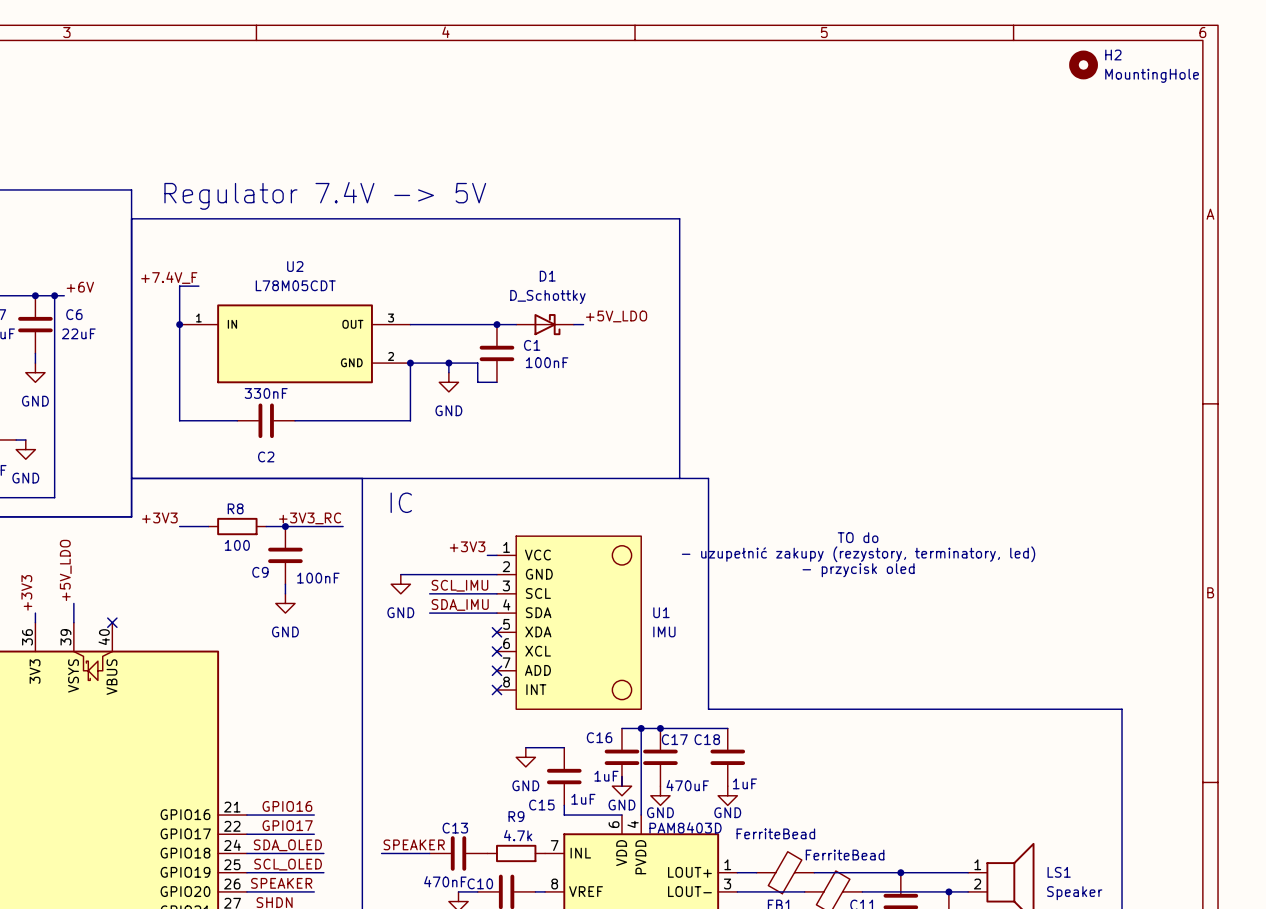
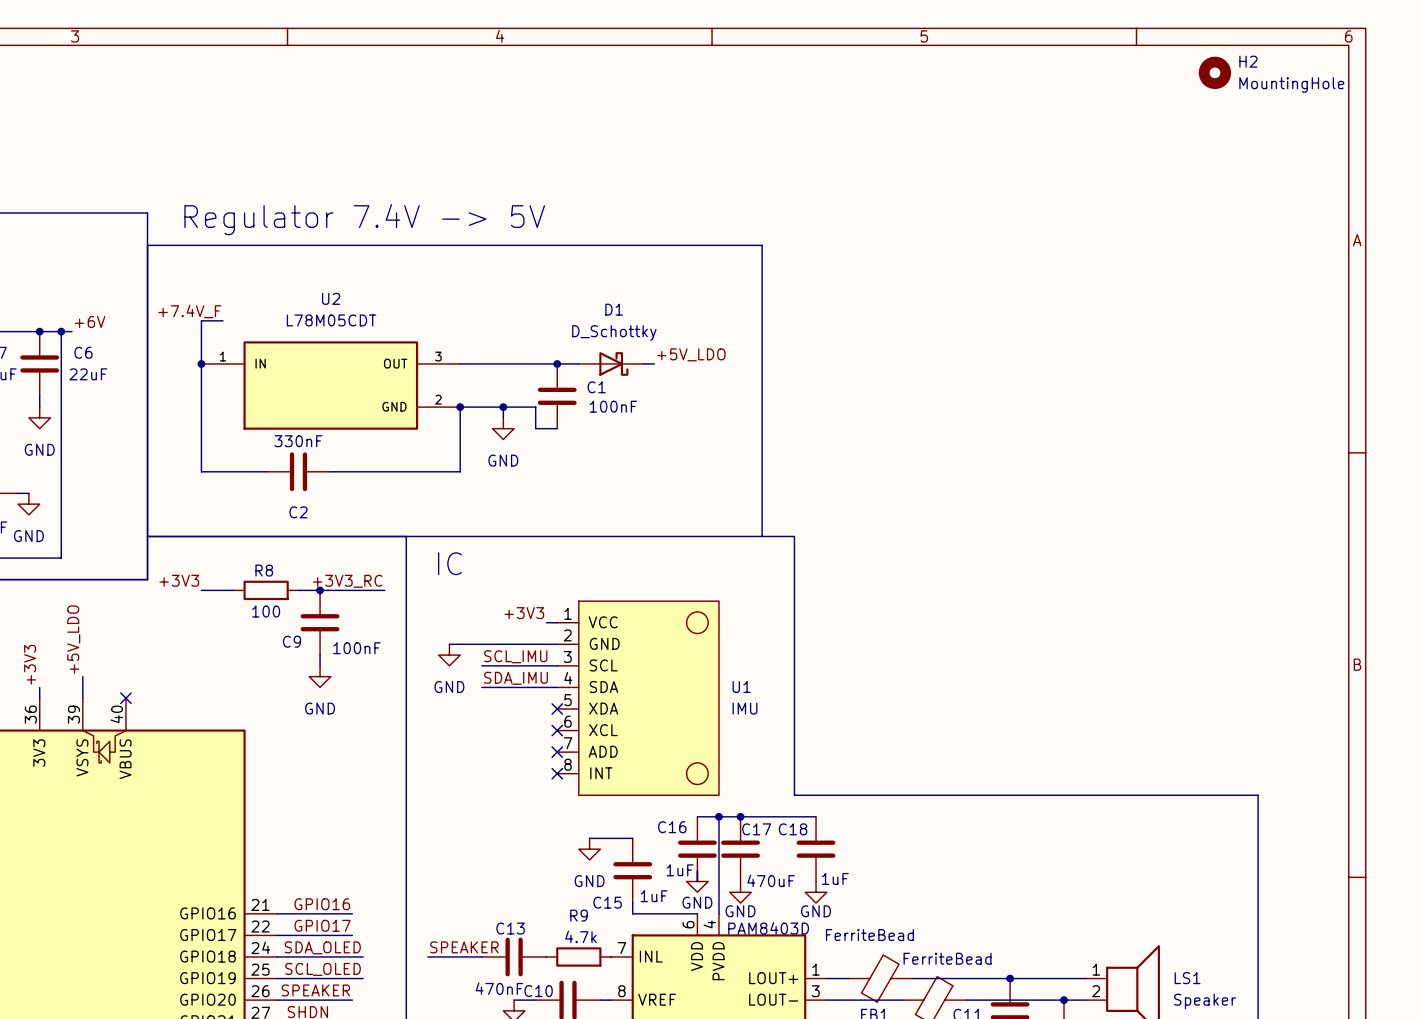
text: TO do (858, 537) -> none
text: - uzupełnić zakupy (rezystory, terminatory, led) (858, 554) -> none
text: - przycisk oled (858, 570) -> none

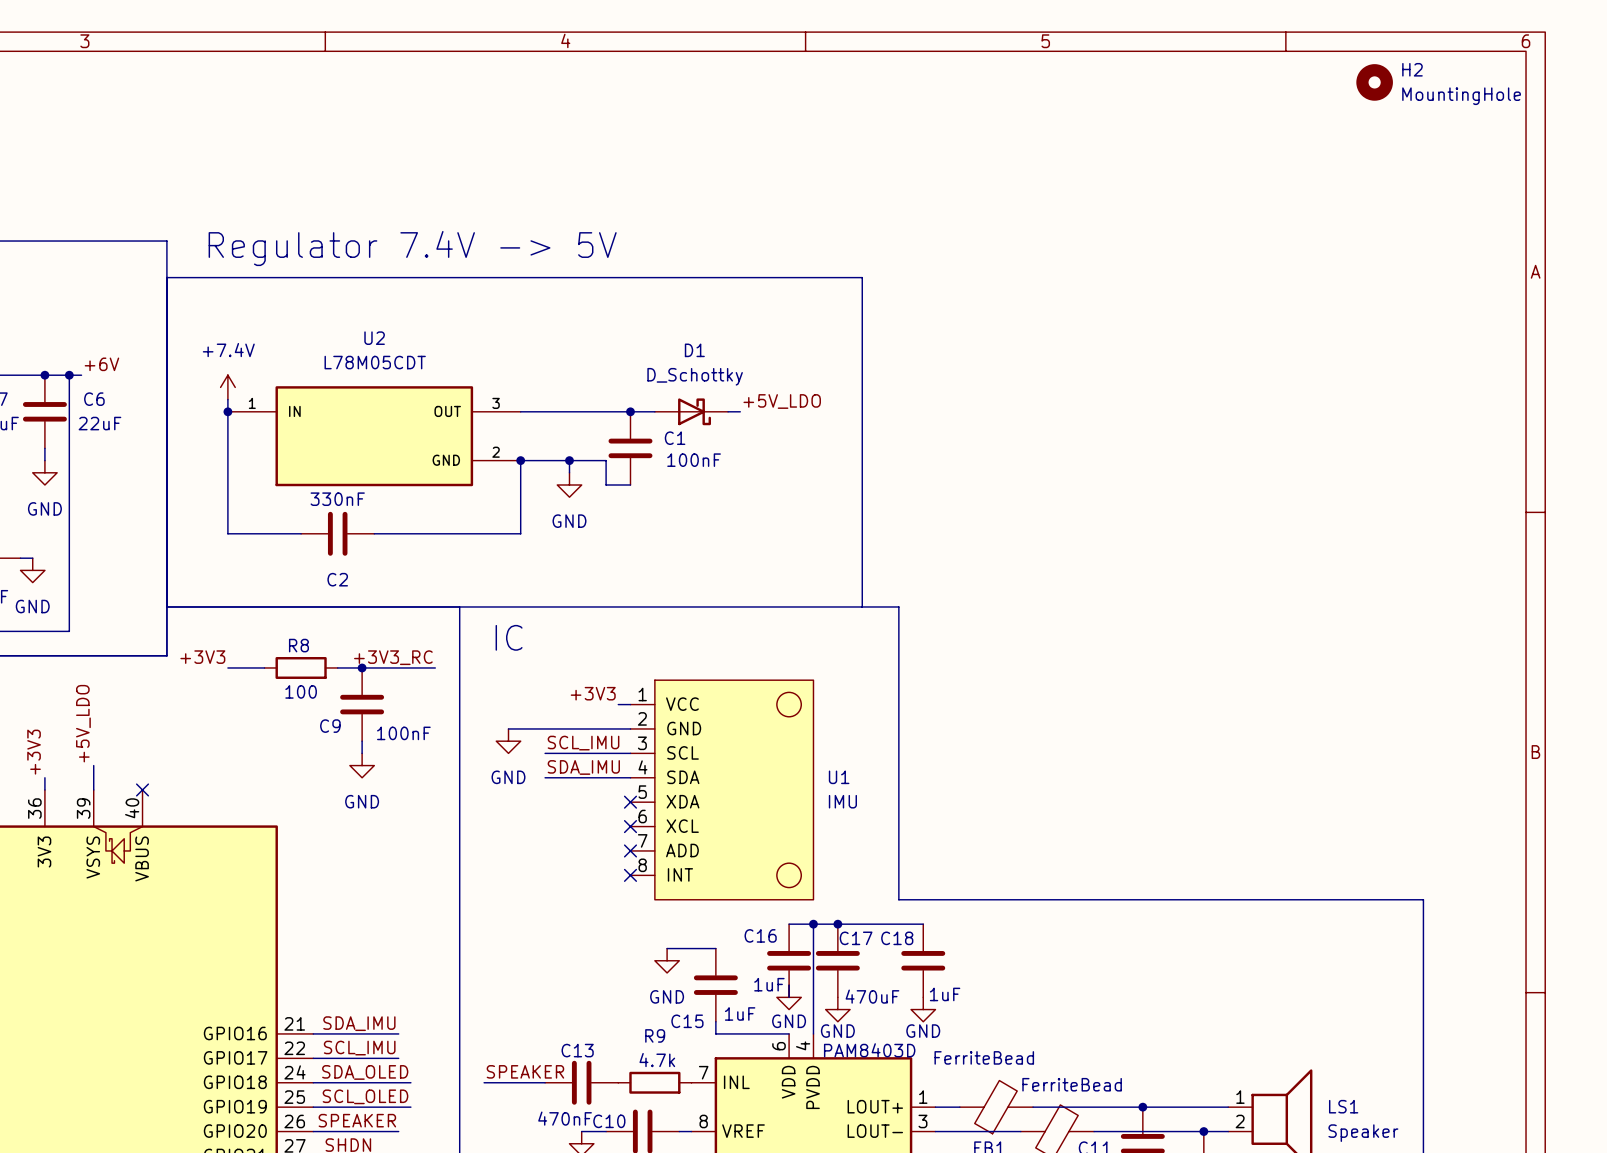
label: +7.4V_F (189, 311) -> none
wire: (223, 320) (201, 320) (201, 353) -> none
power symbol: none -> +7.4V (227, 387)
label: GPIO16 (322, 904) -> SDA_IMU (359, 1023)
label: GPIO17 (322, 925) -> SCL_IMU (359, 1048)

